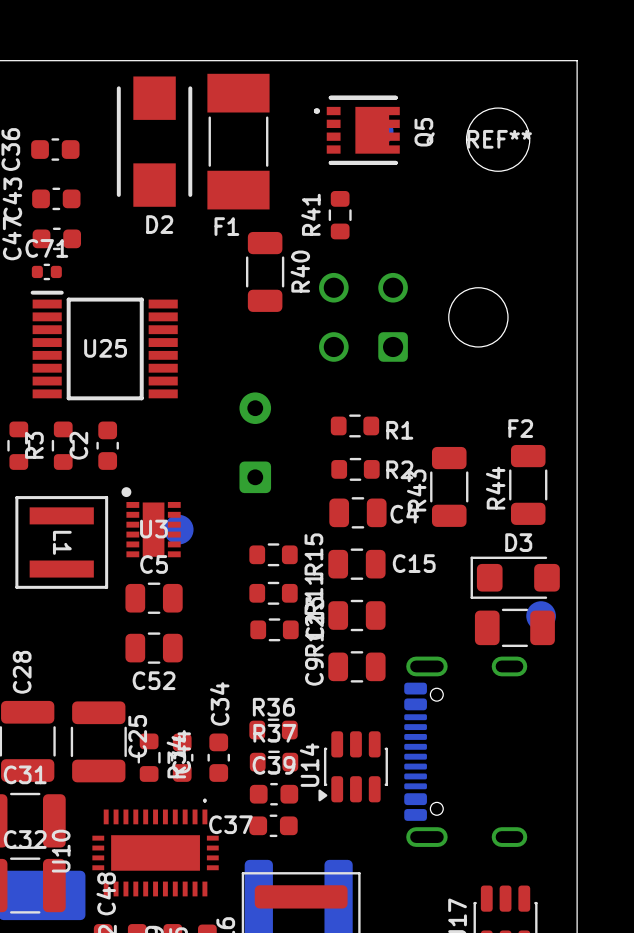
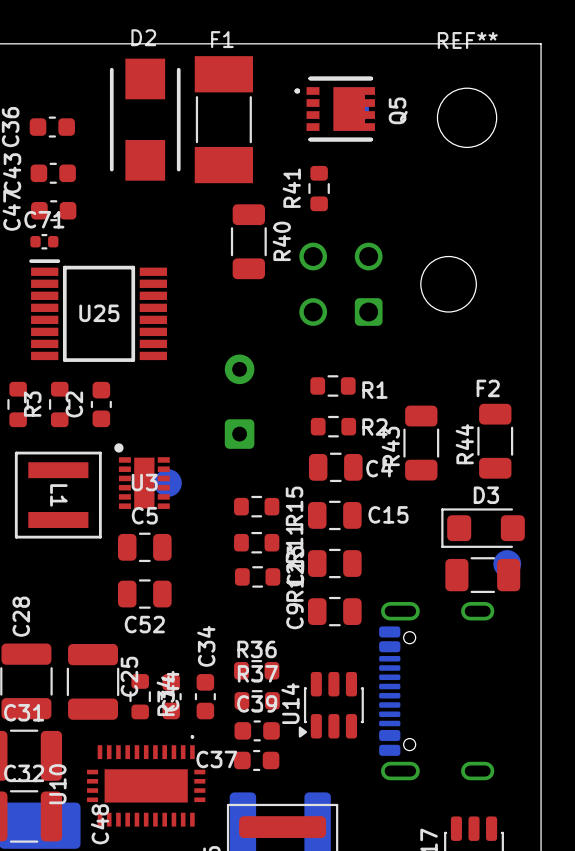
REF** name position: REF** (499, 139) -> REF** (467, 40)
D2 name position: D2 (159, 224) -> D2 (143, 37)
F1 name position: F1 (226, 226) -> F1 (222, 39)

